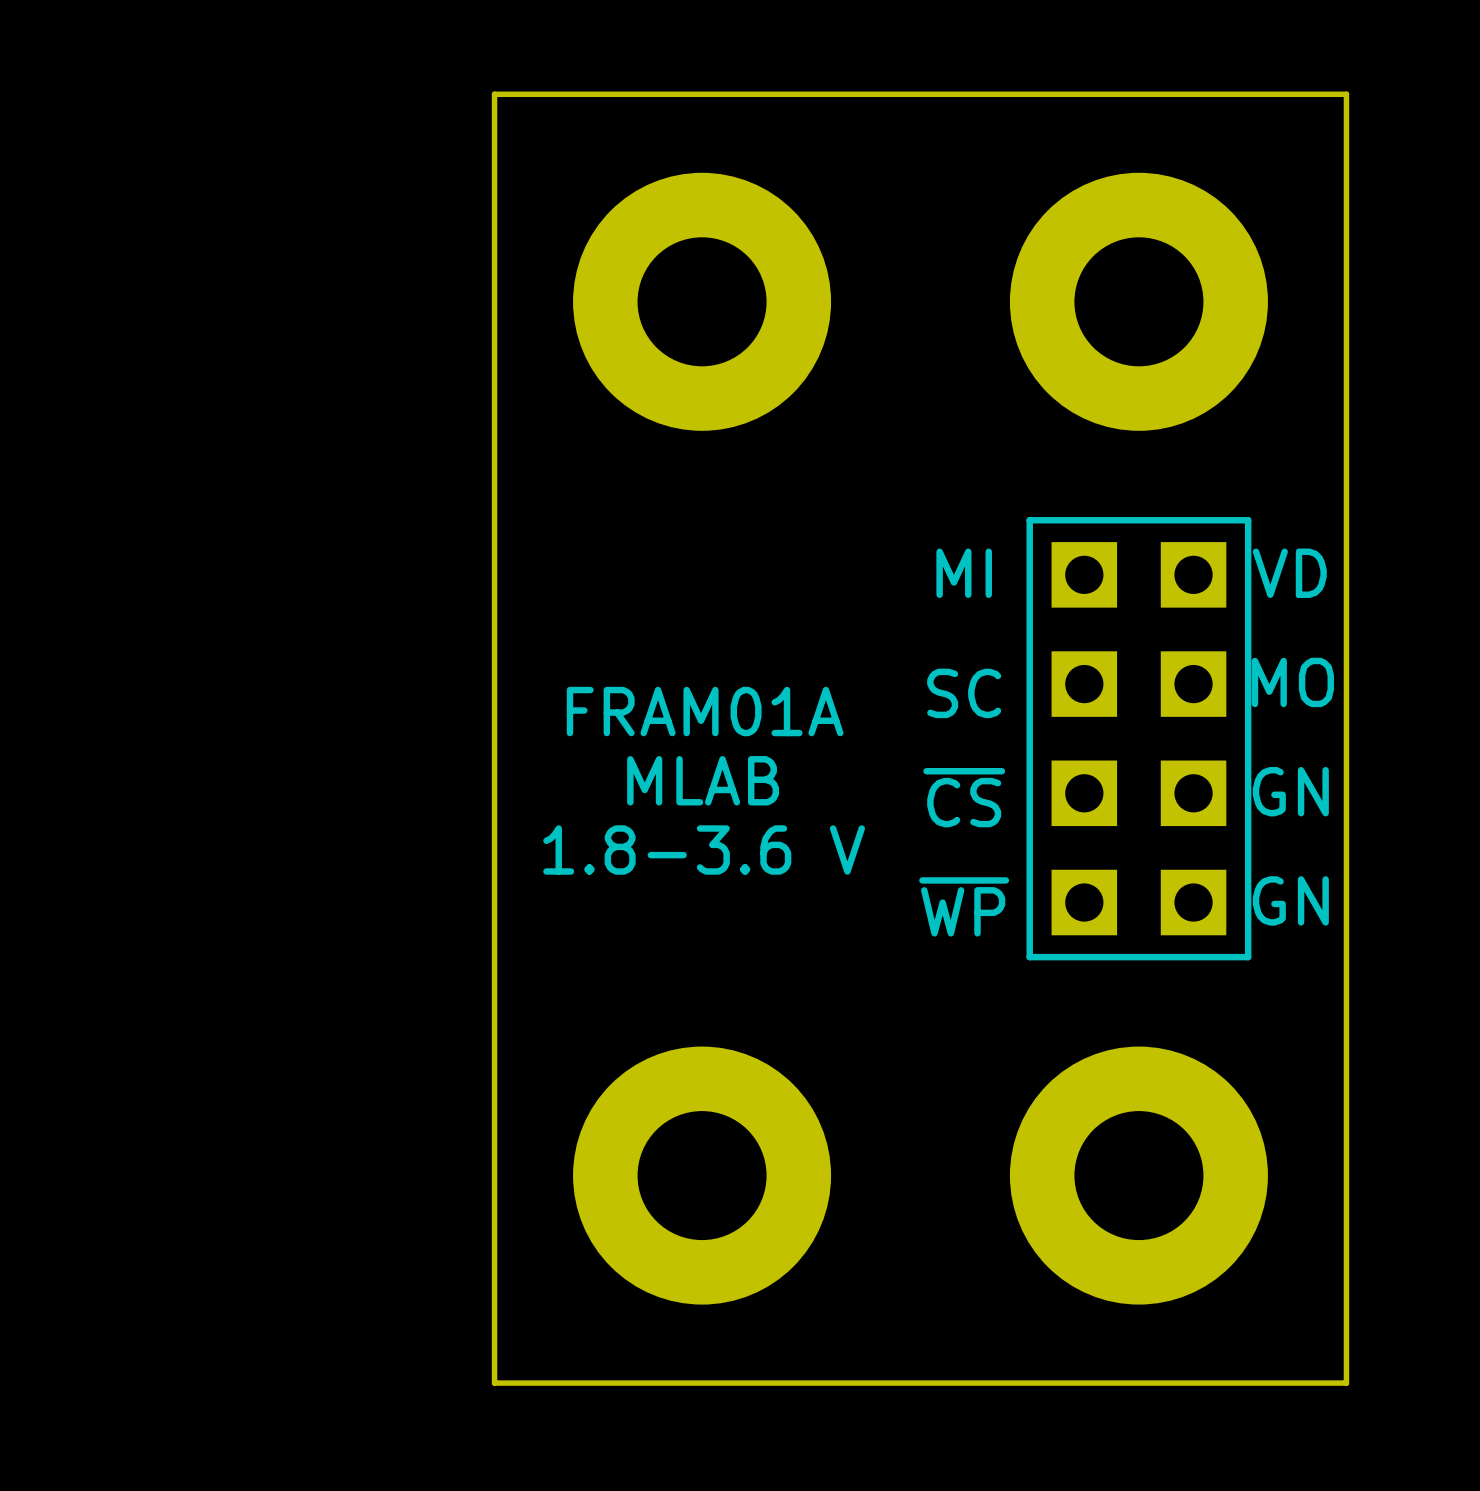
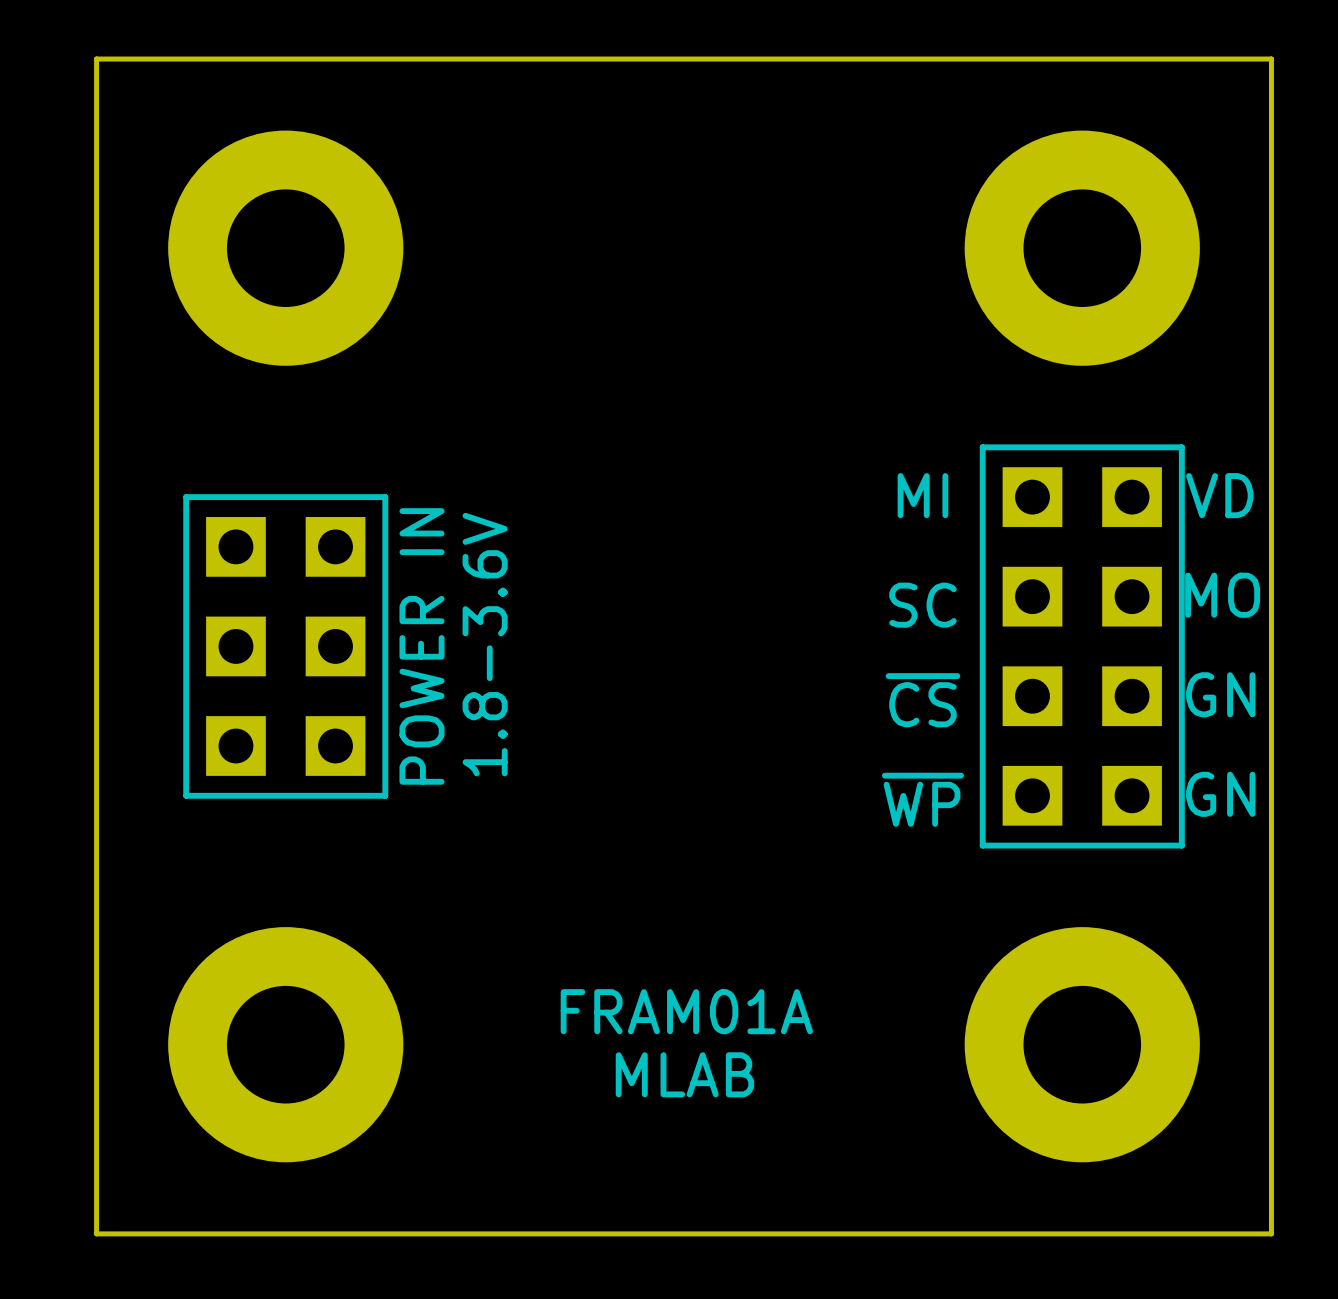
board edge: (494, 94) (494, 1383) -> (494, 59) (96, 59) (96, 1233) (494, 1233)
part position: (702, 301) -> (285, 248)
text position: FRAM01A (705, 711) -> FRAM01A (686, 1011)
part: none -> (285, 646)
text: none -> POWER IN (421, 646)
text position: MLAB (703, 780) -> MLAB (684, 1074)
text: 1.8-3.6 V (704, 850) -> 1.8-3.6V (485, 644)
part position: (702, 1175) -> (285, 1044)

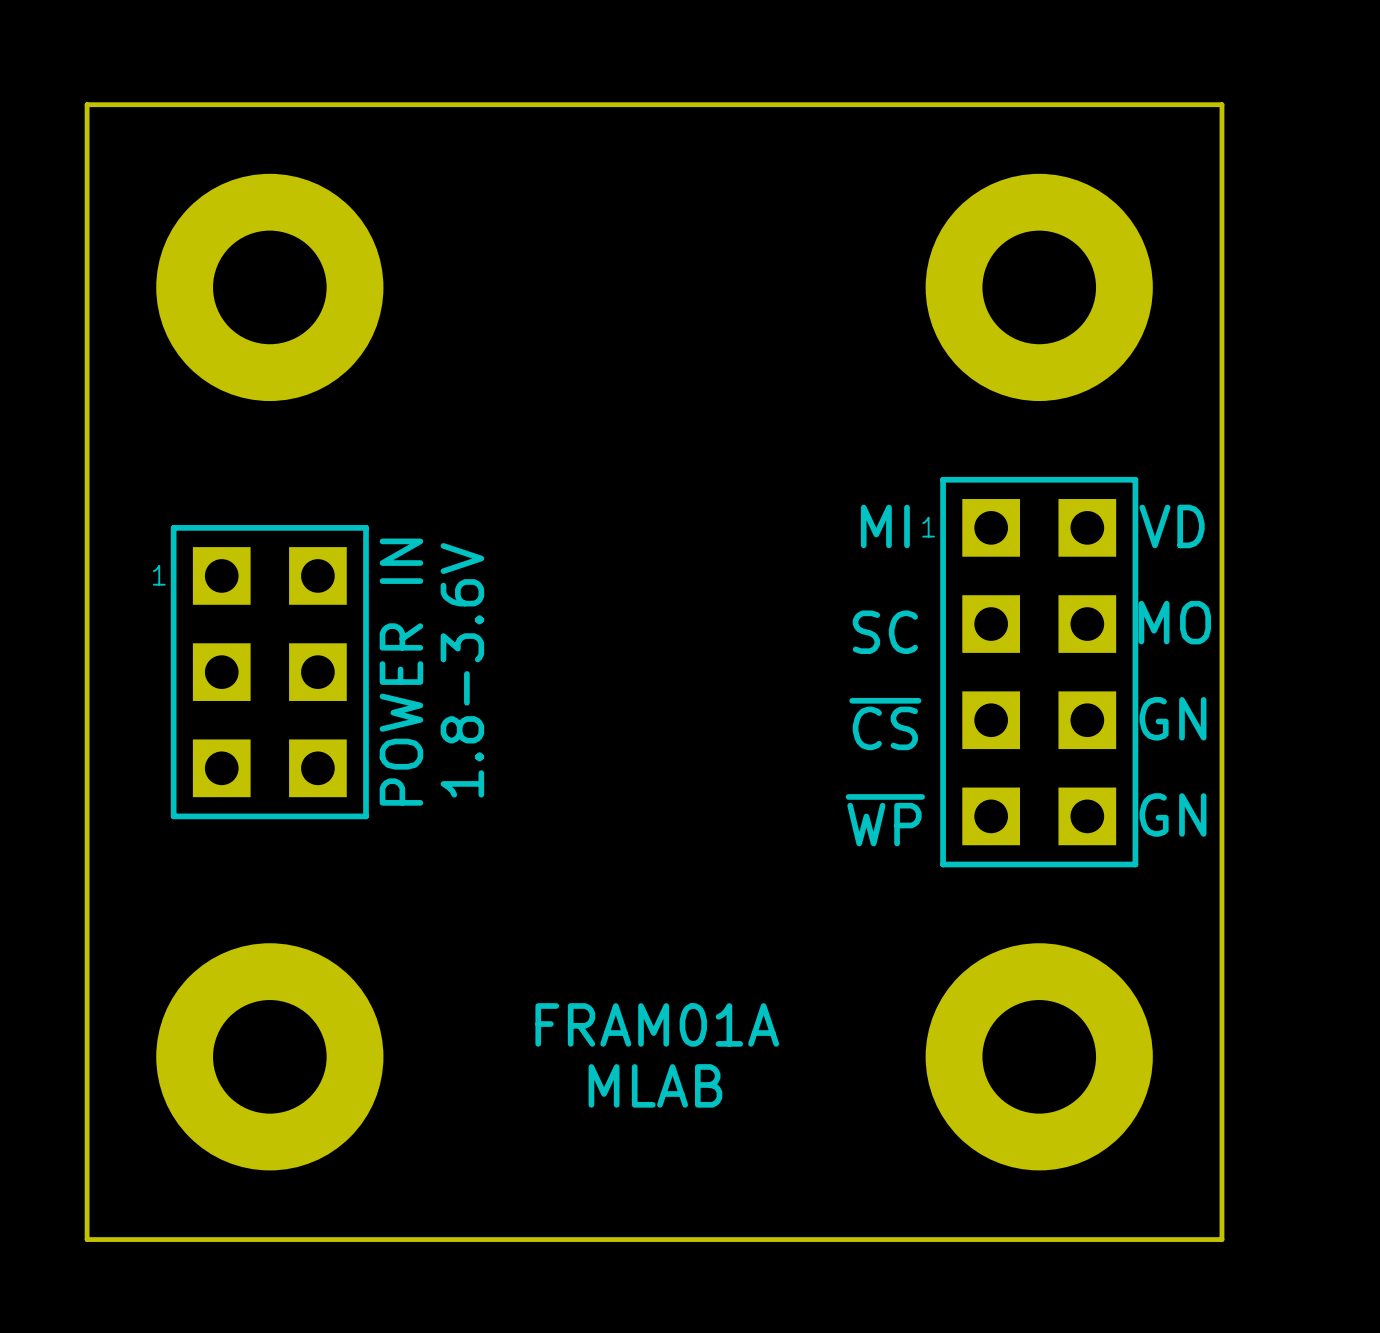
part text: none -> 1 (928, 527)
part text: none -> 1 (159, 575)

